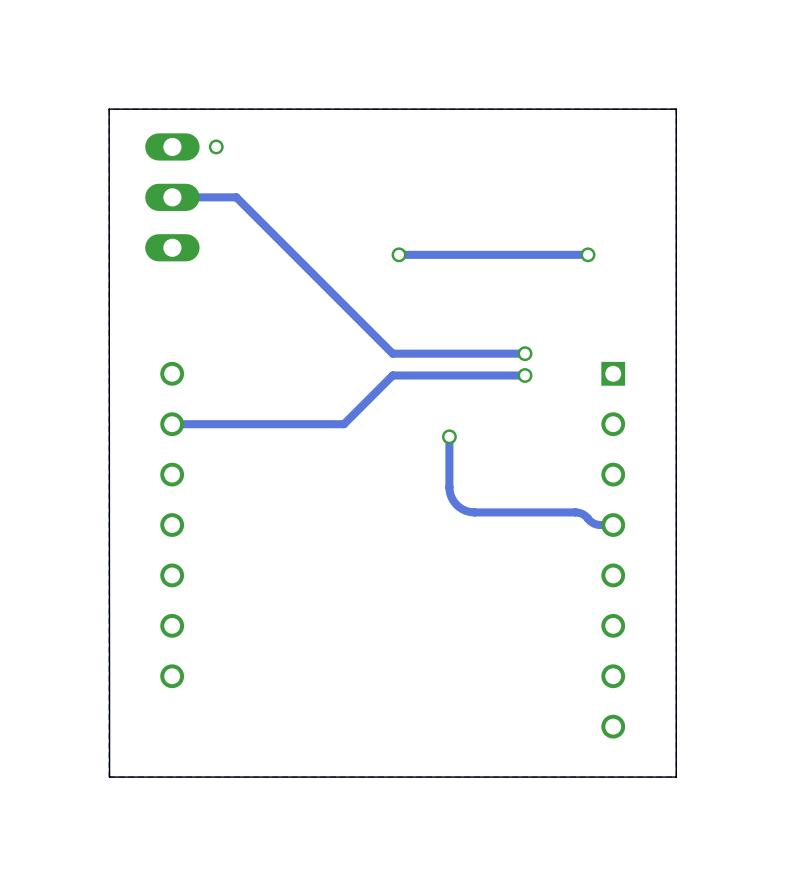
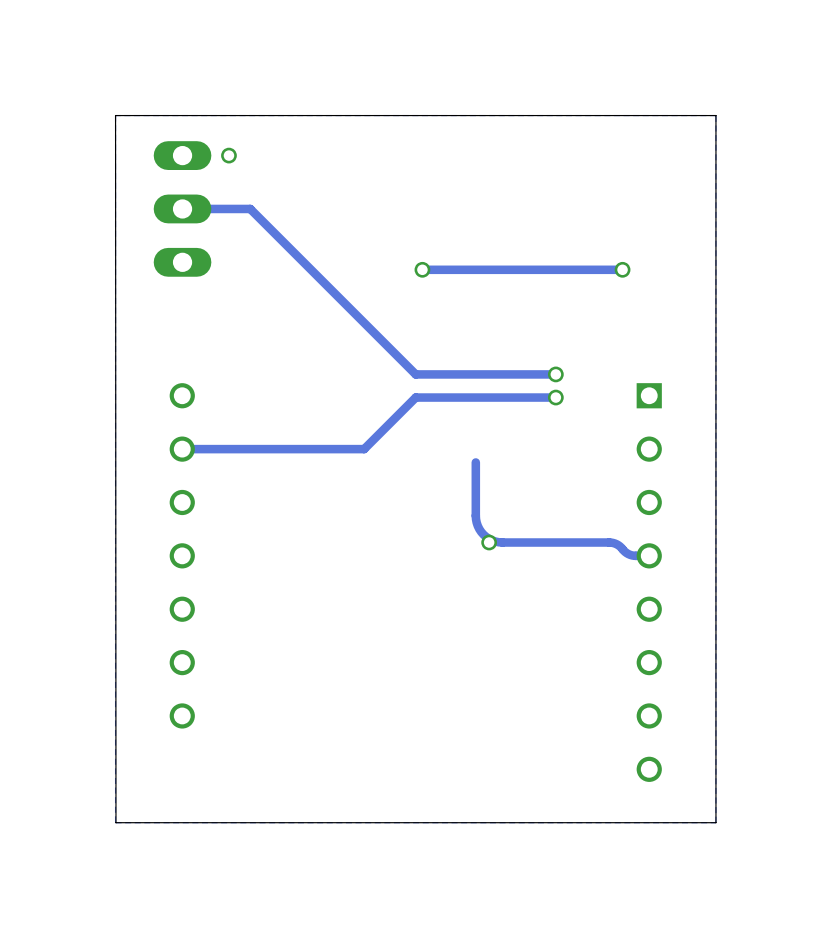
via position: (449, 436) -> (489, 542)

